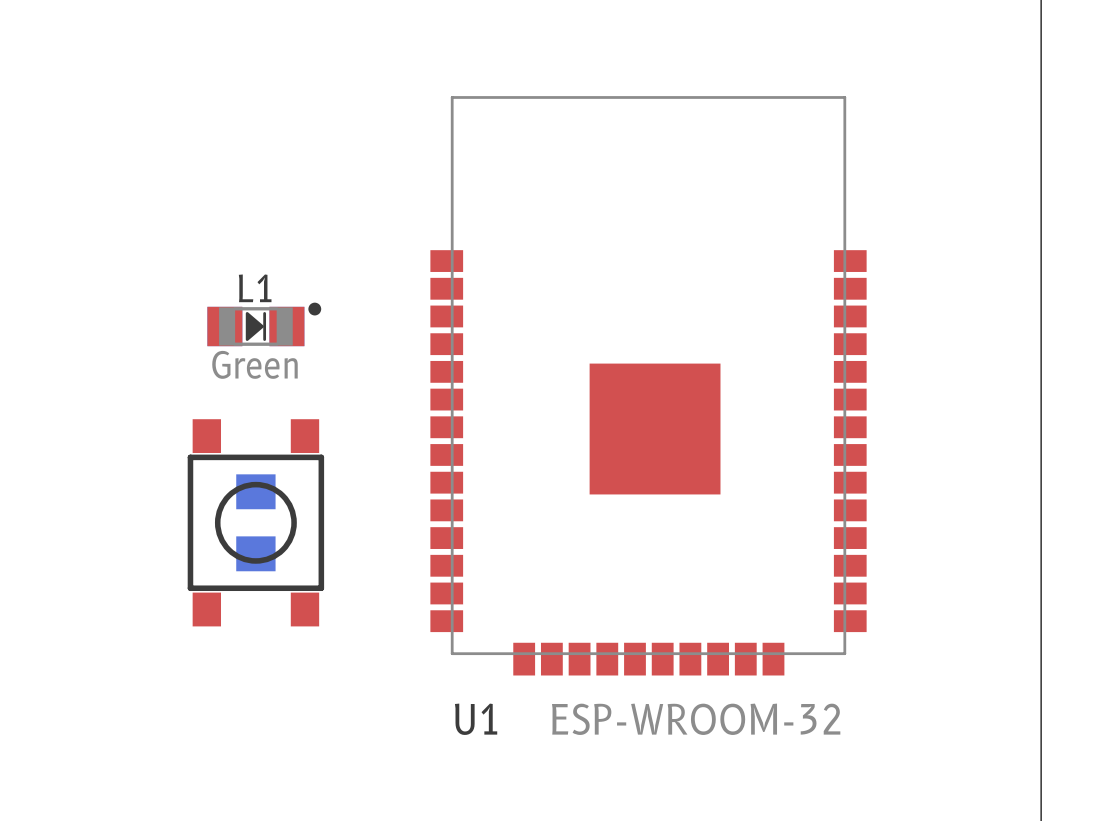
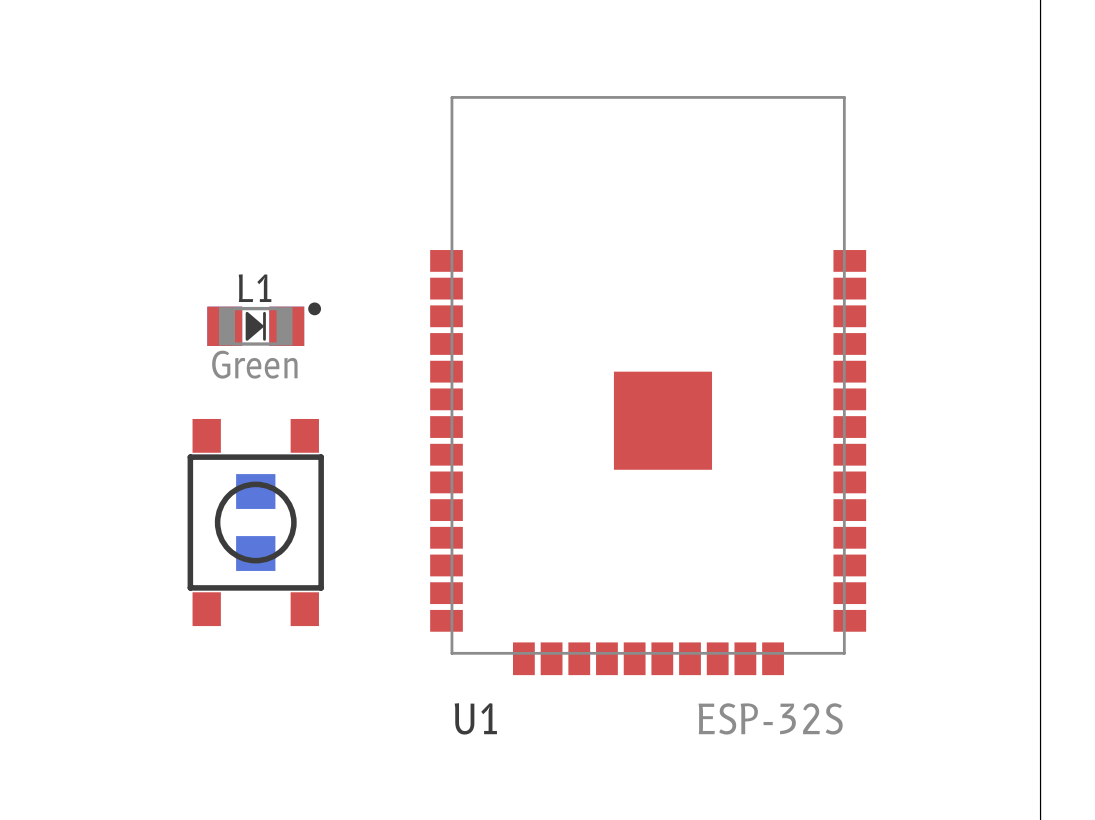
U1 footprint: [430, 96, 867, 676] -> [430, 96, 867, 676]
U1 value: ESP-WROOM-32 (696, 719) -> ESP-32S (770, 718)

